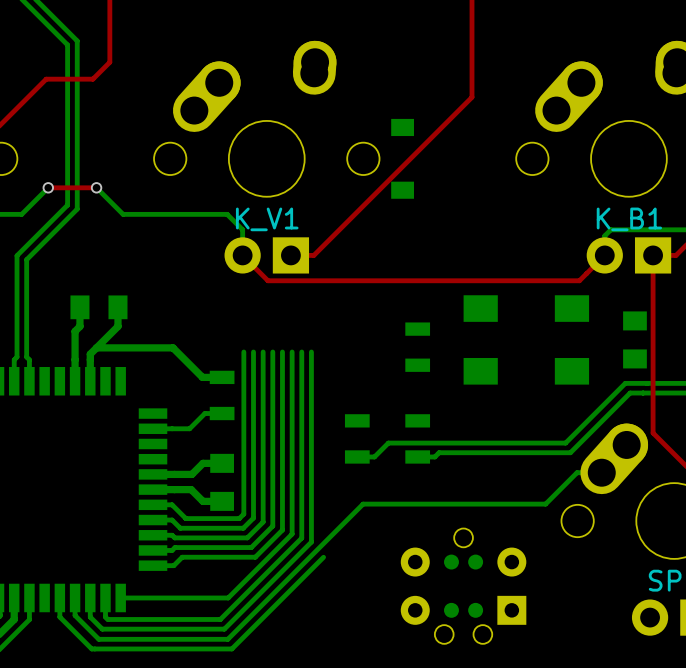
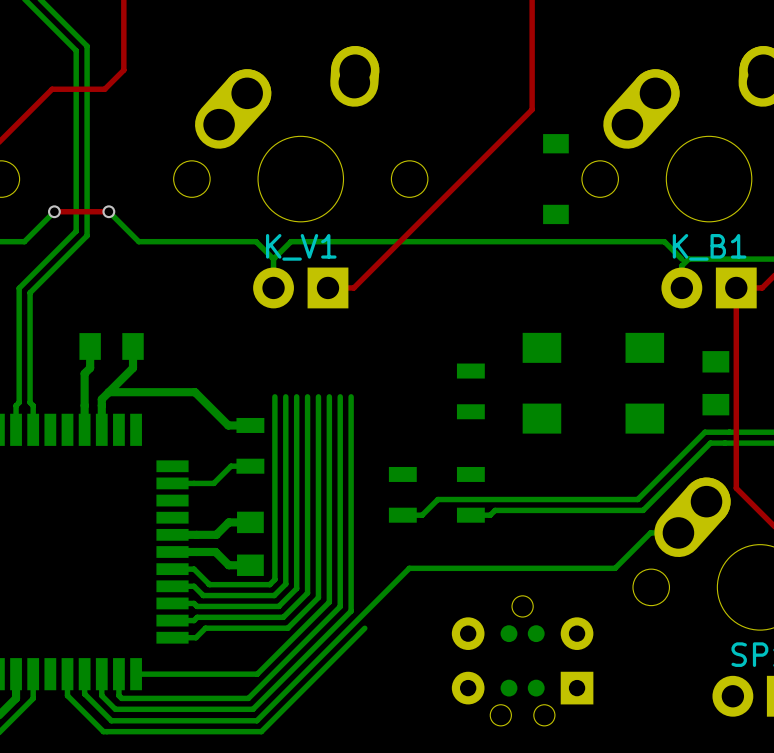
part position: (402, 158) -> (555, 179)
bottom track: none -> (273, 259) (290, 241) (664, 241) (681, 259)
top track: (242, 255) (267, 280) (579, 280) (604, 255) -> none

